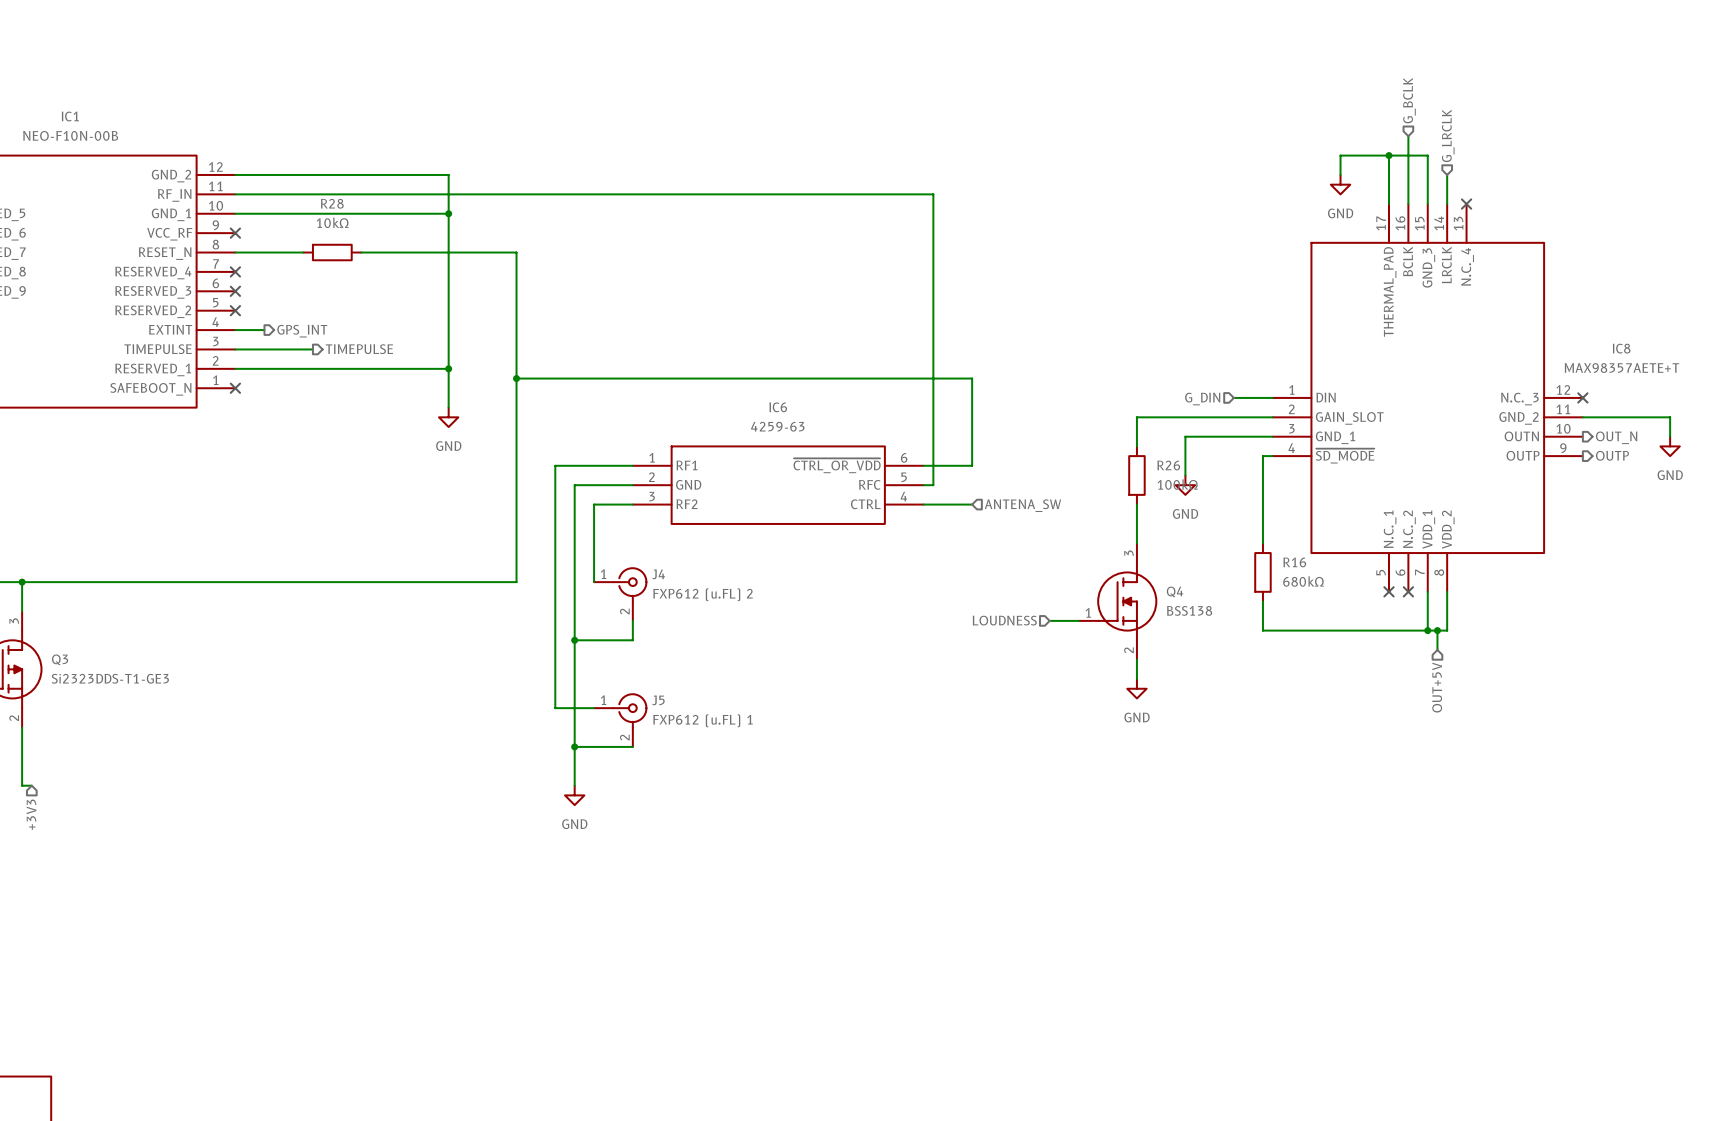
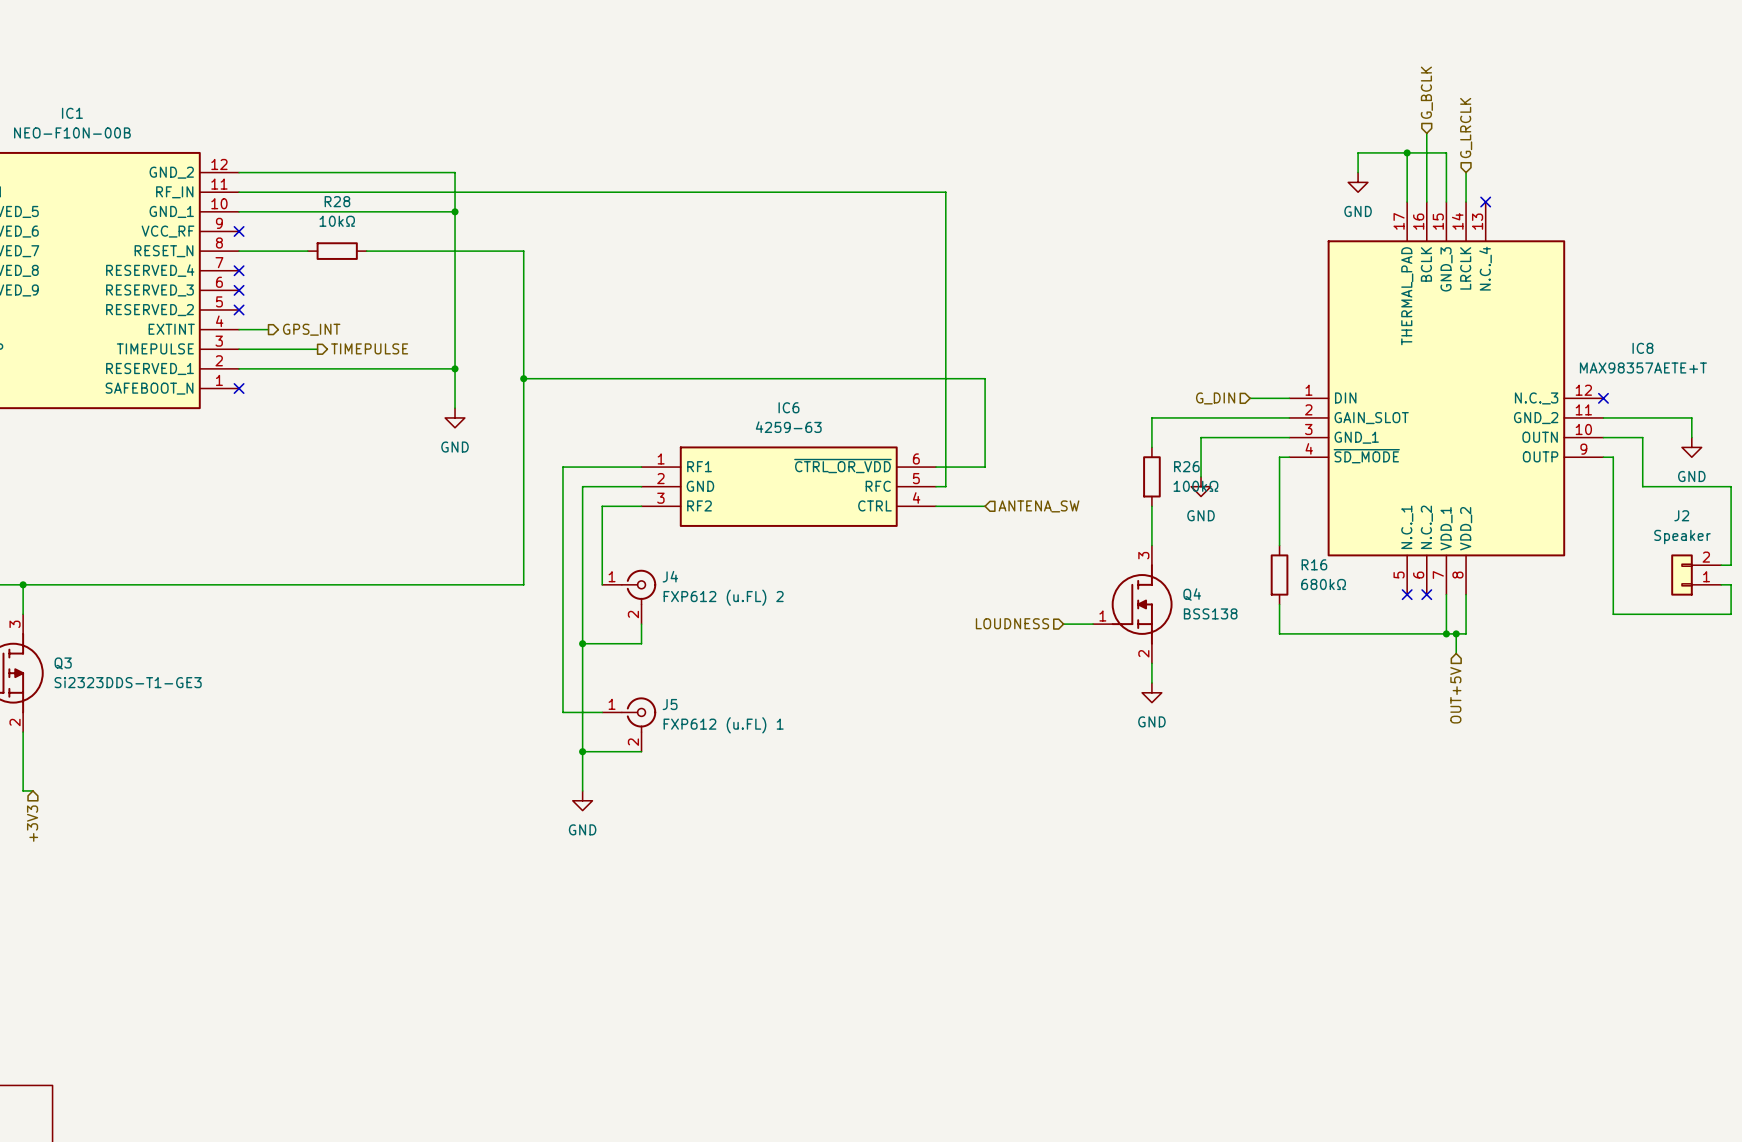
wire: none -> (1603, 437) (1642, 437) (1642, 486) (1731, 486) (1731, 565) (1721, 565)
hierarchical label: OUT_N (1616, 437) -> none
hierarchical label: OUTP (1612, 455) -> none
wire: none -> (1603, 457) (1613, 457) (1613, 614) (1731, 614) (1731, 584) (1721, 584)
J2: none -> Speaker (1696, 575)

